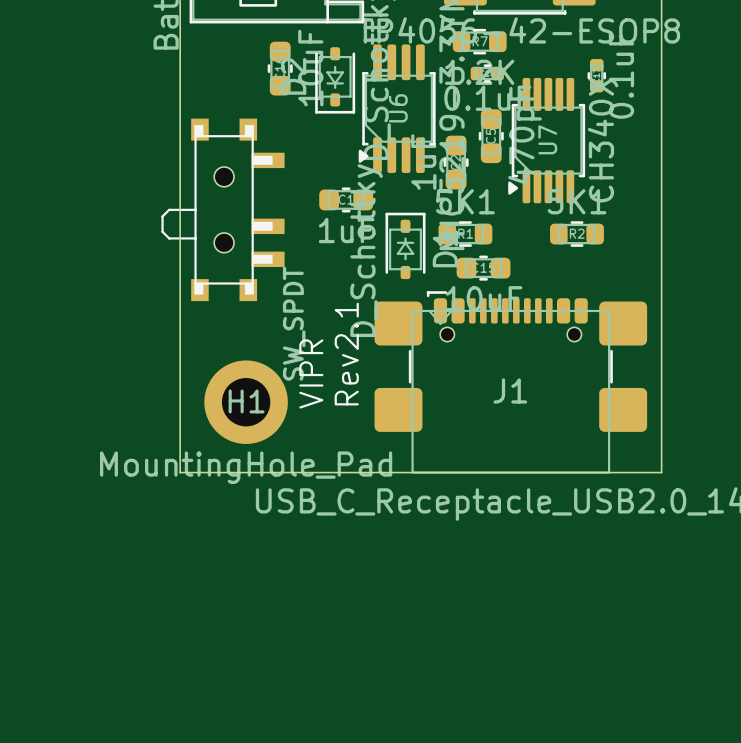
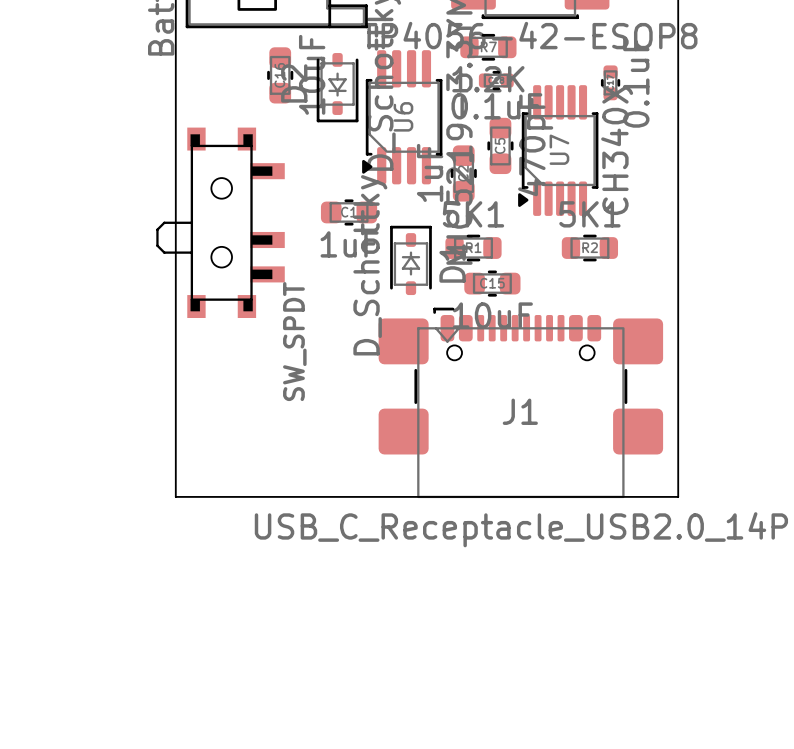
text: Rev2.1 (346, 354) -> none
text: VIPR (311, 373) -> none
H1: MountingHole_Pad (246, 402) -> none

